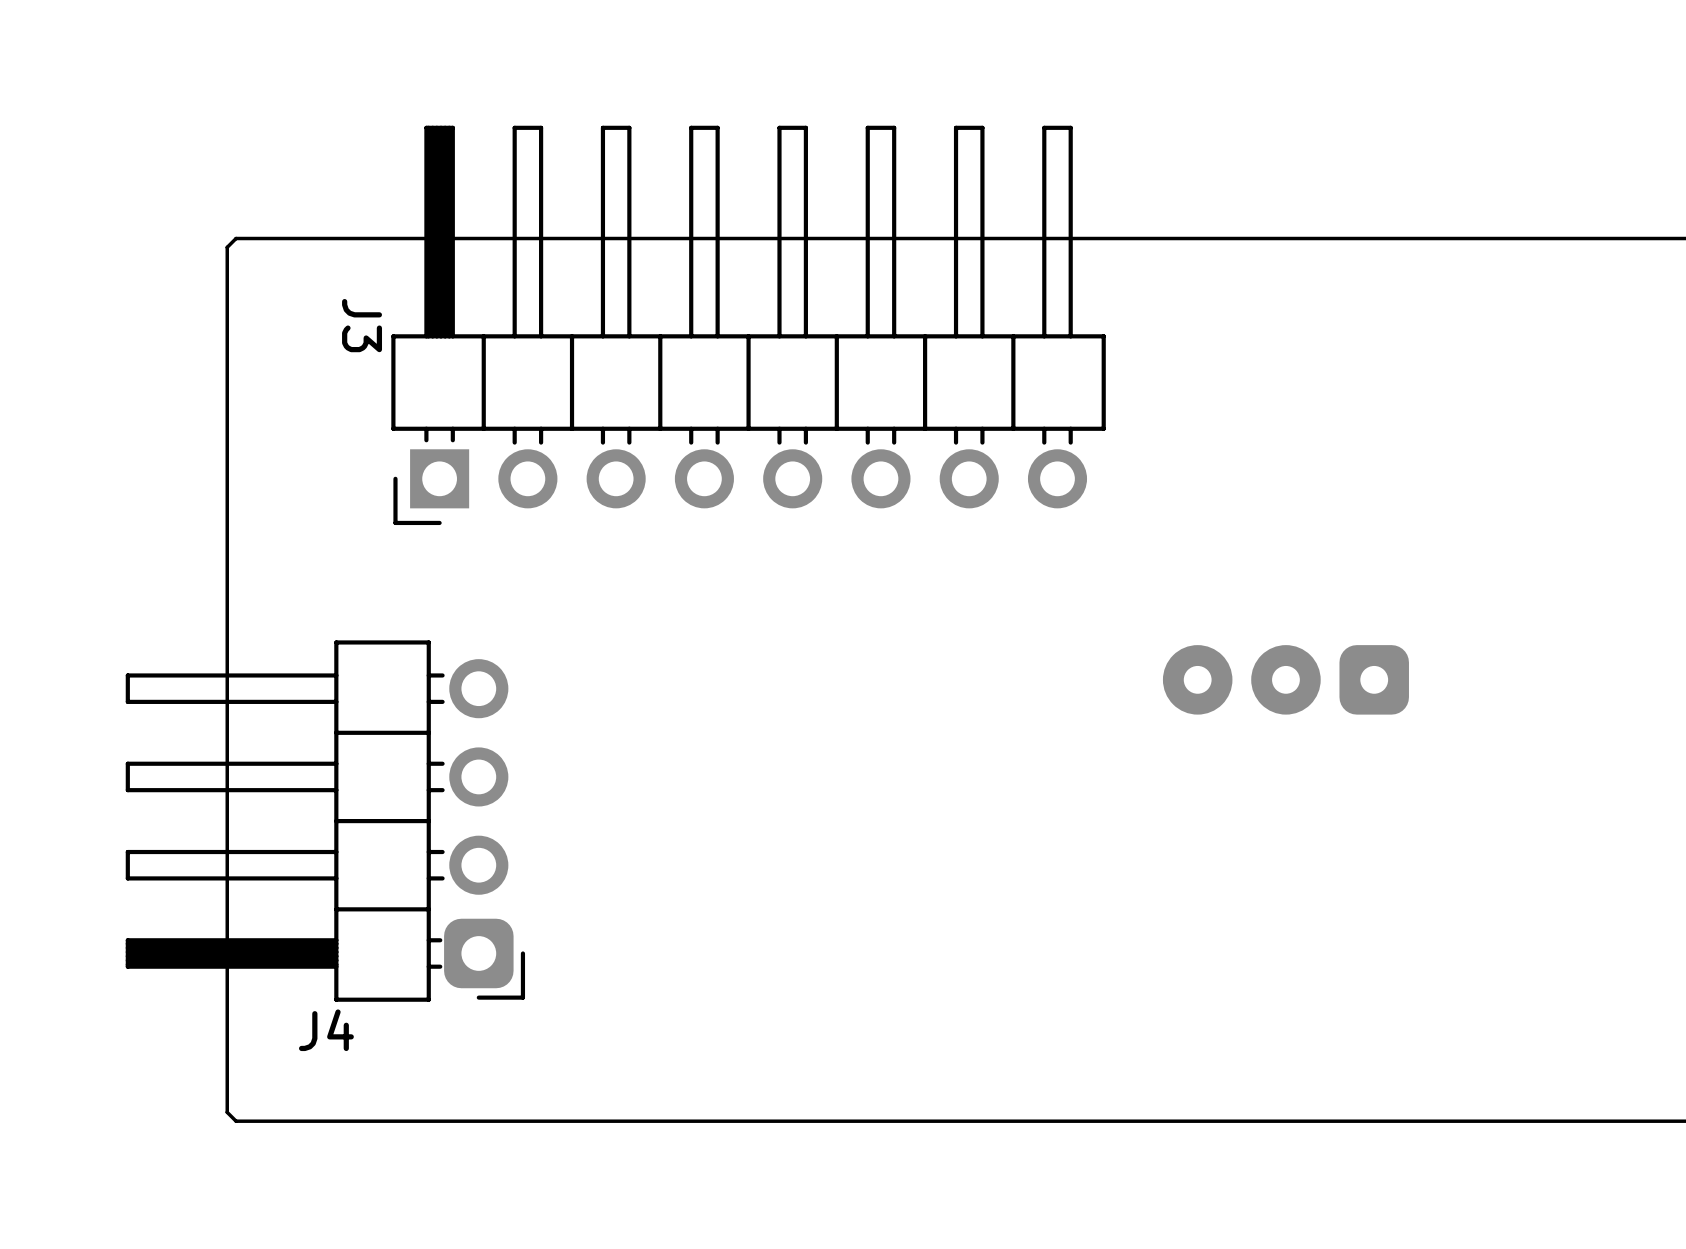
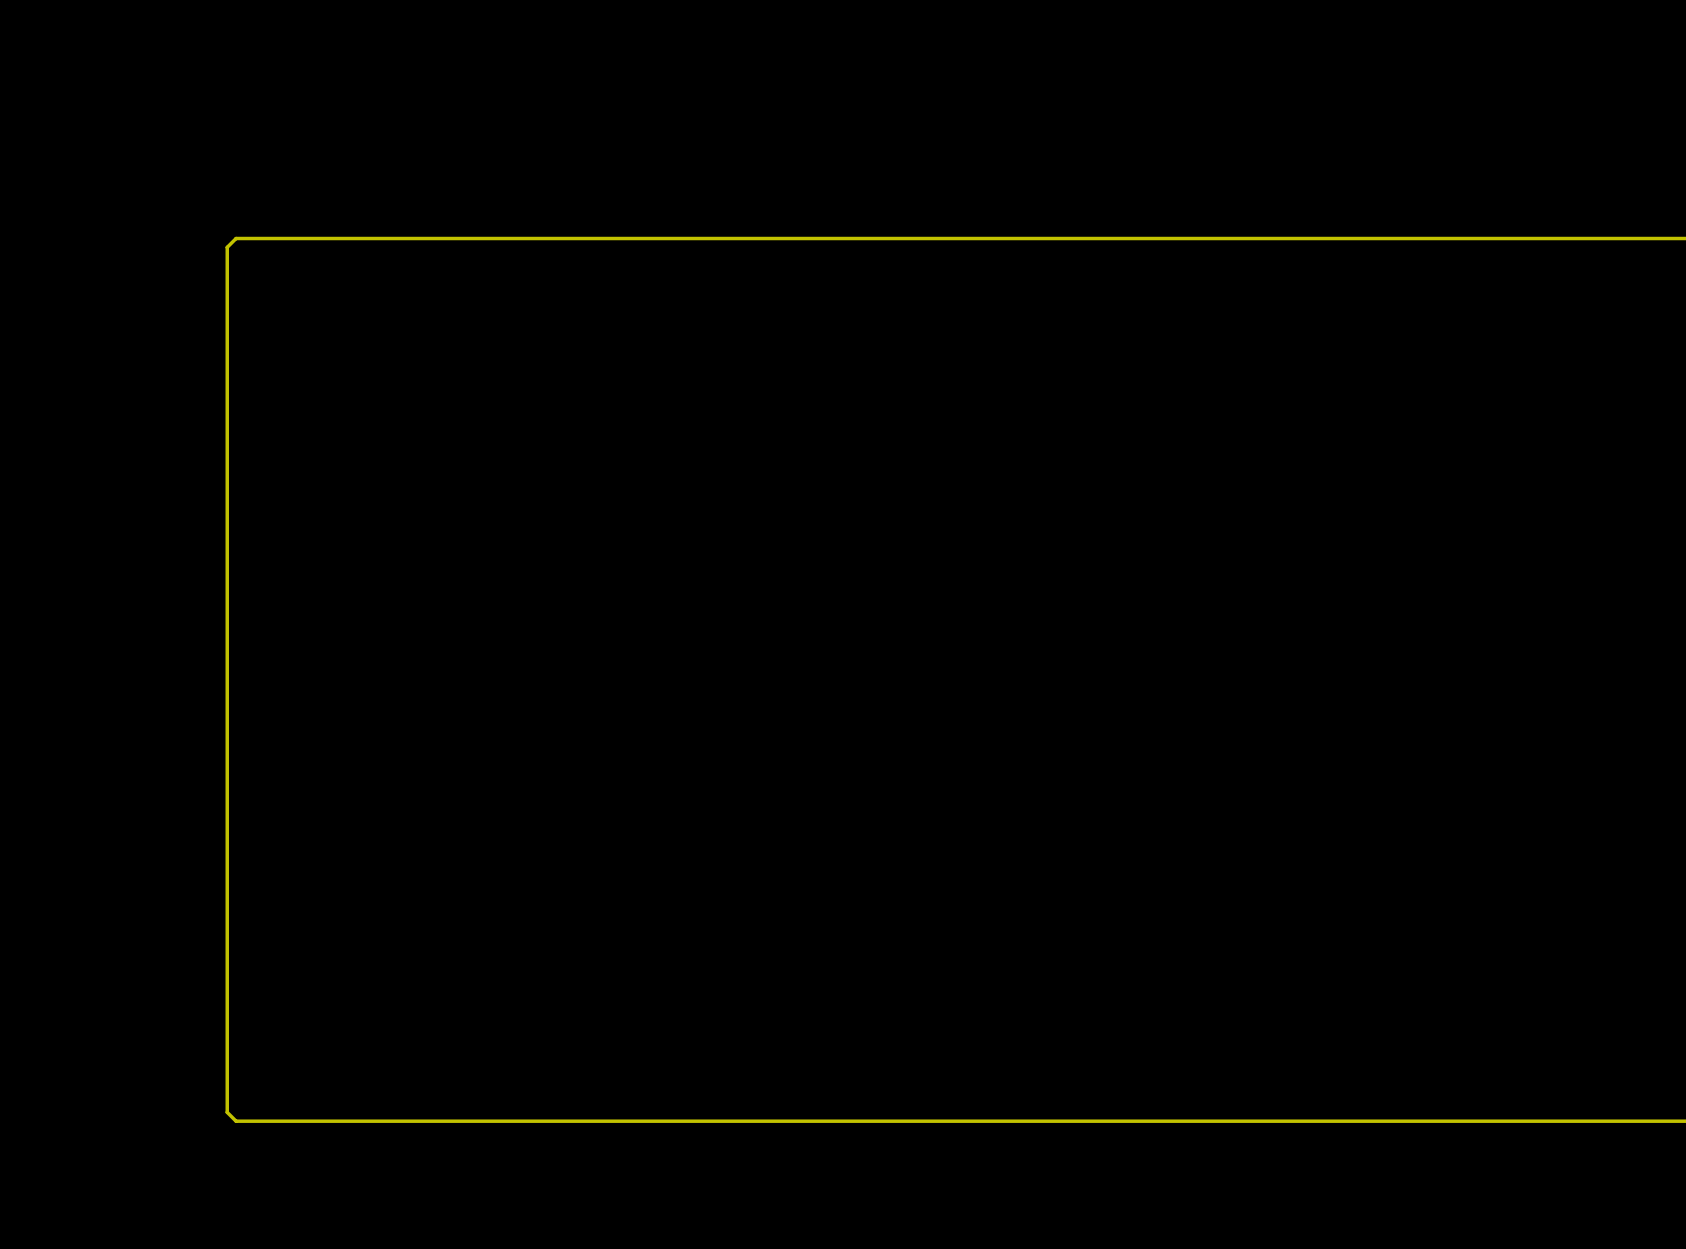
J3: (748, 325) -> none
part: (1285, 679) -> none
J4: (325, 821) -> none

